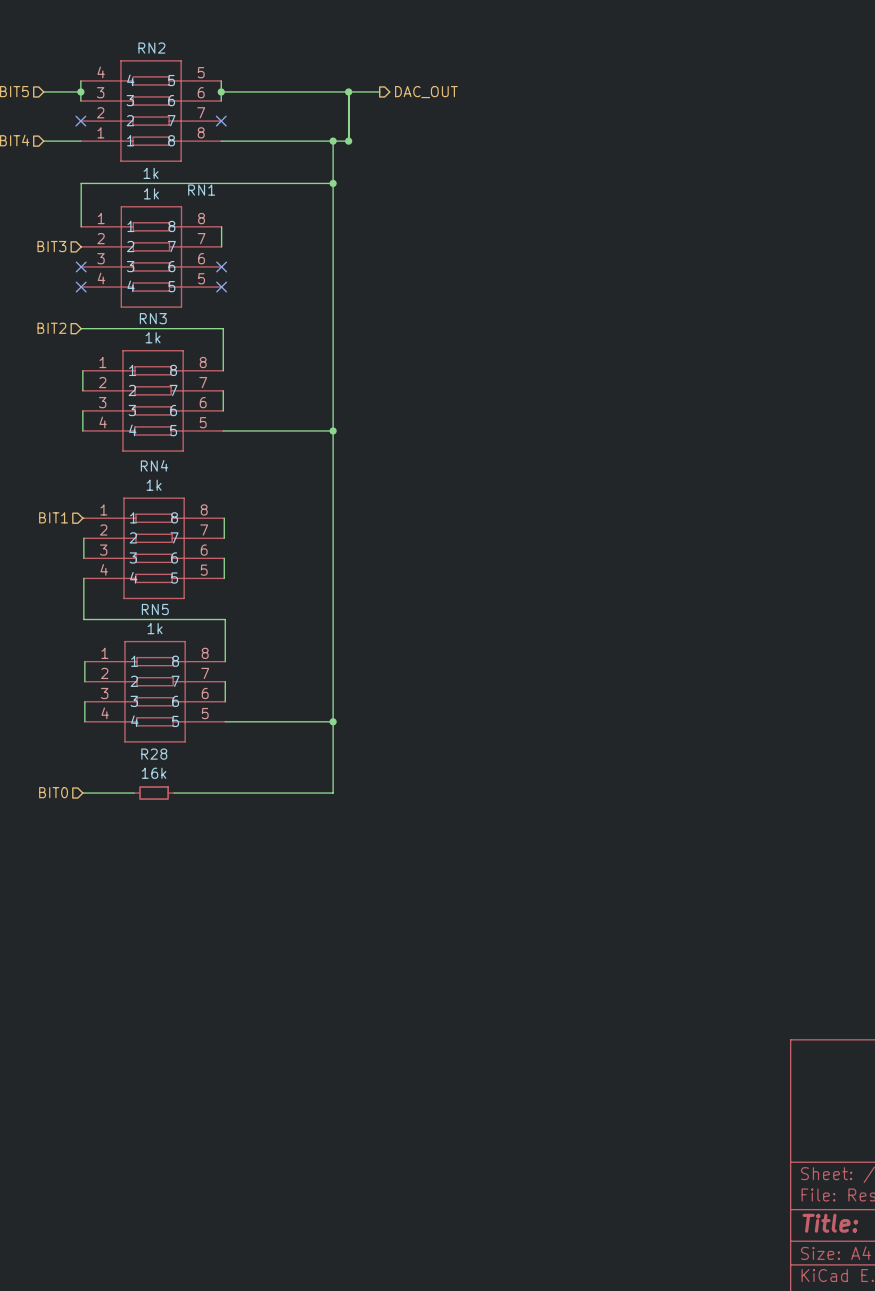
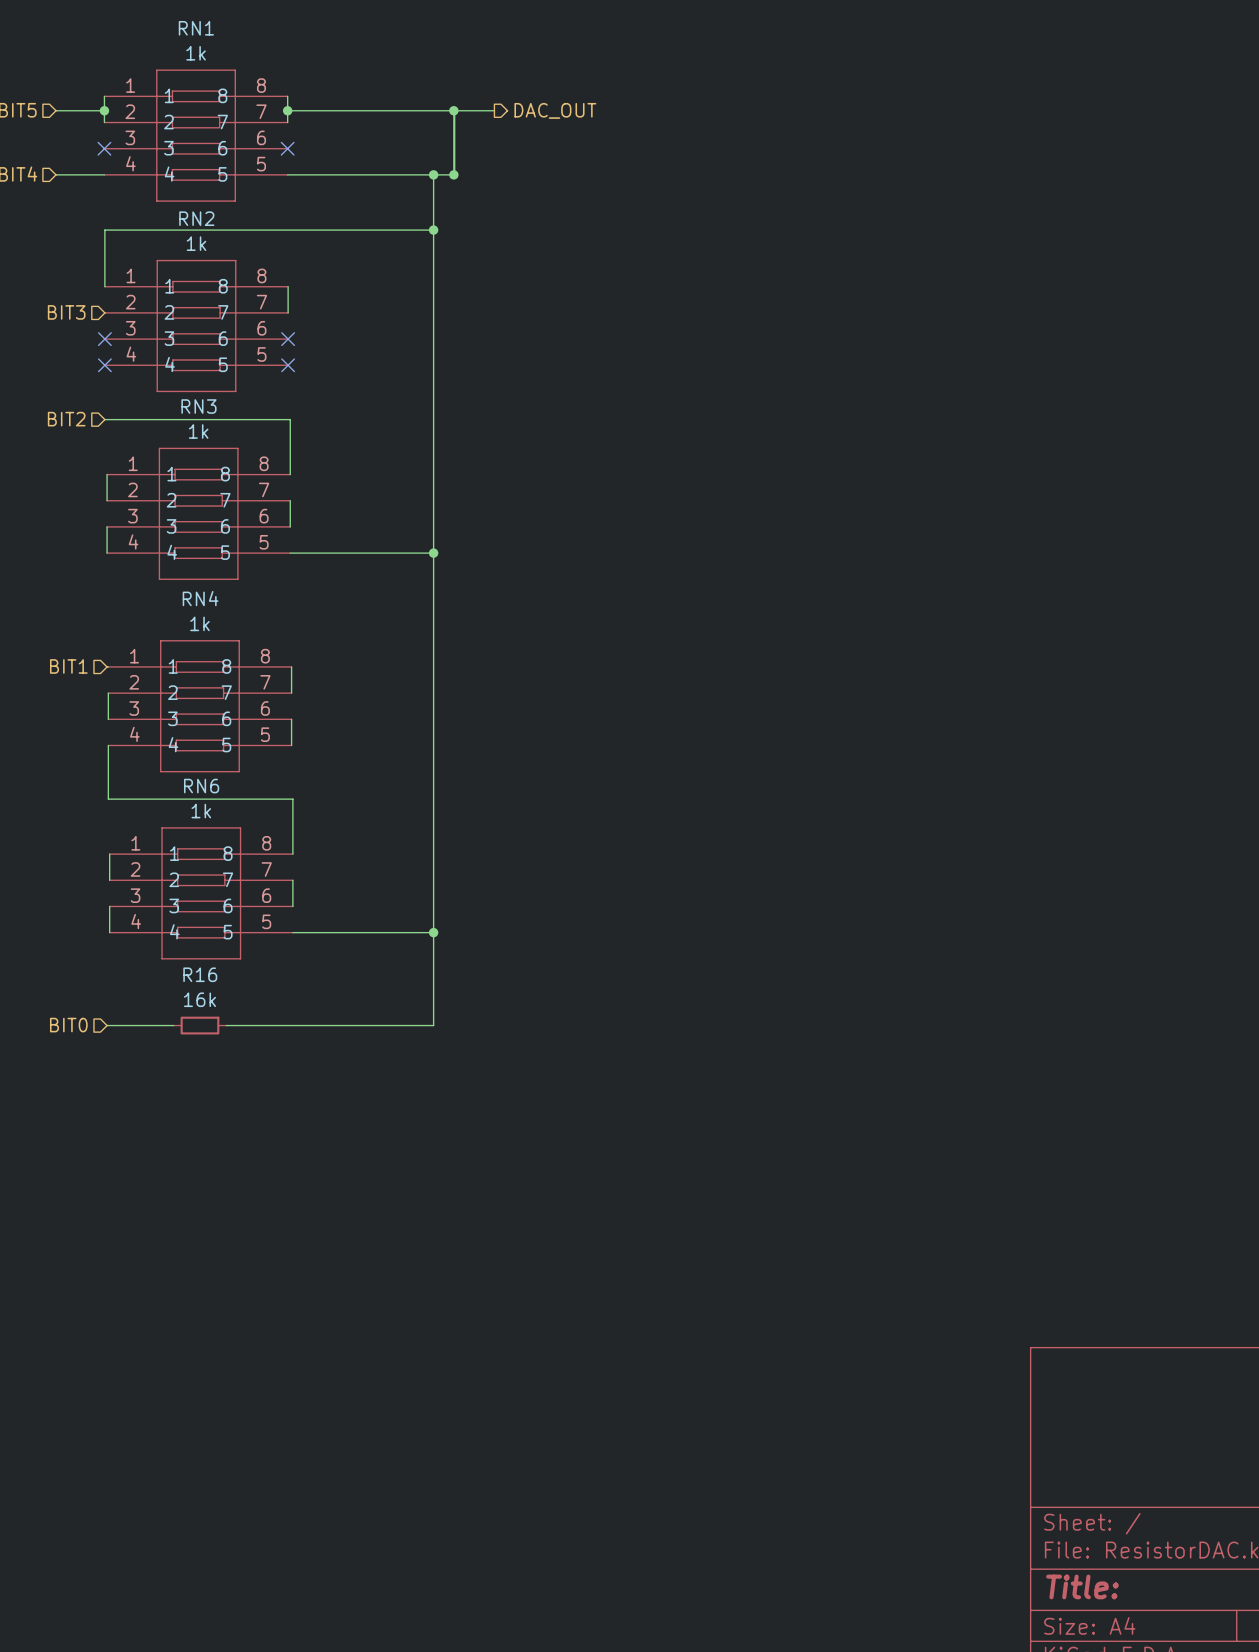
RN2 name position: RN2 (151, 48) -> RN2 (196, 218)
RN1 flip: as is (151, 111) -> up-down (196, 135)
RN1 name position: RN1 (201, 190) -> RN1 (196, 28)
RN5 name: RN5 (155, 609) -> RN6 (201, 786)
R28 name: R28 (154, 754) -> R16 (200, 974)

